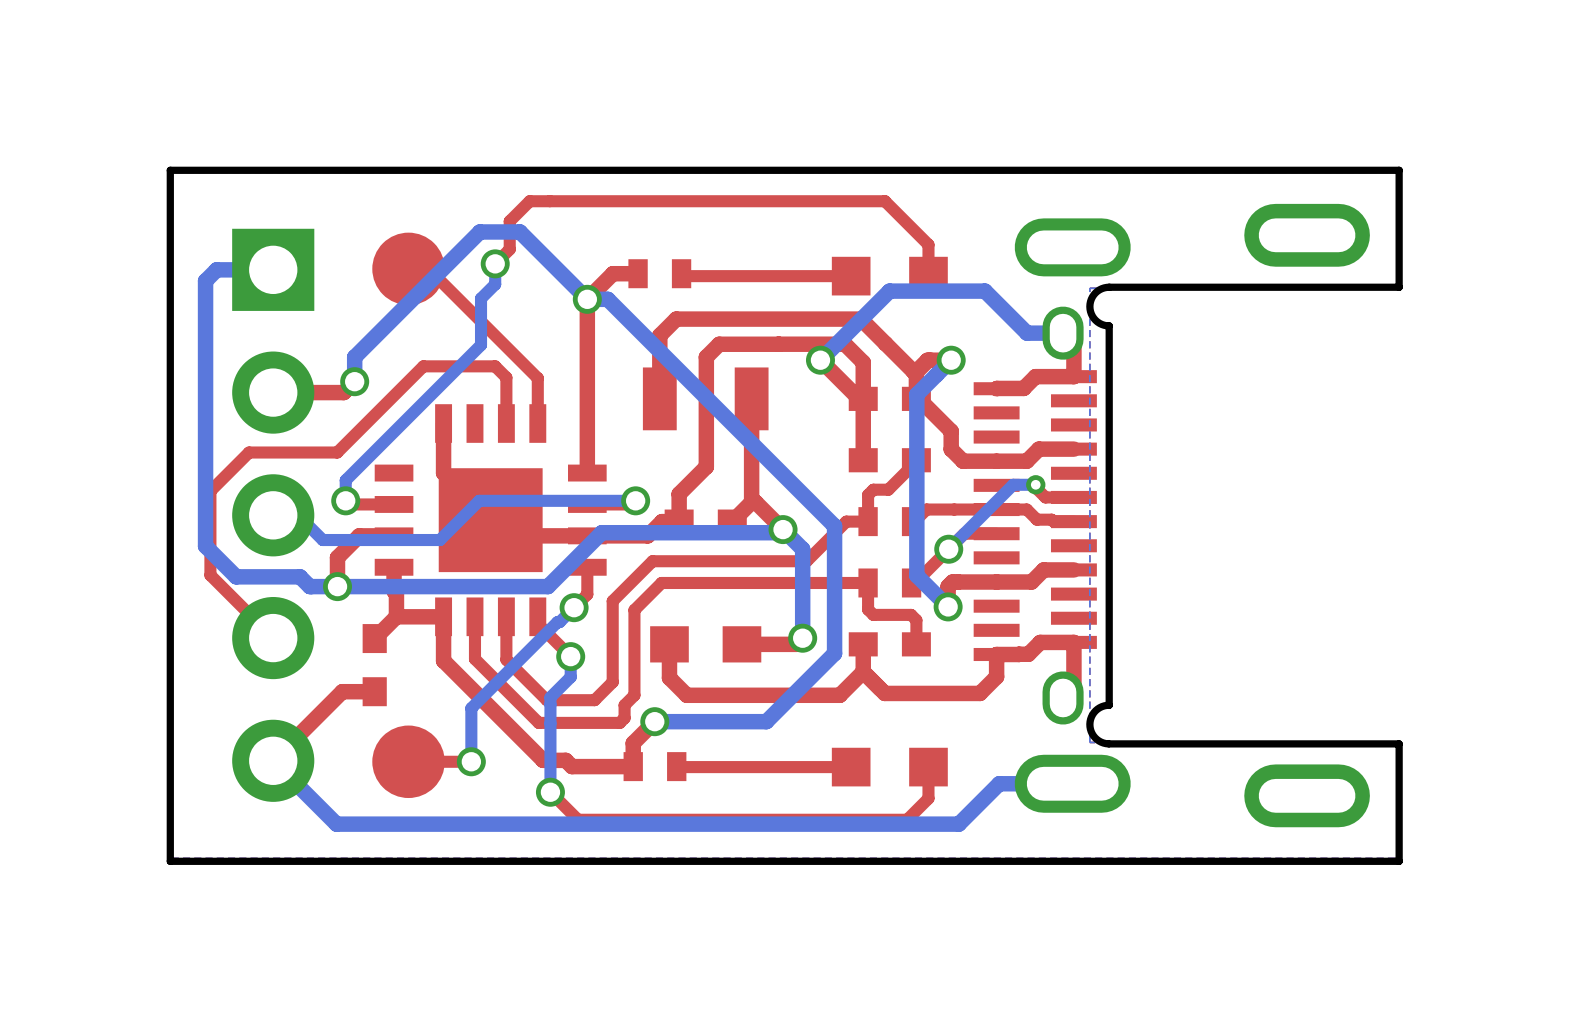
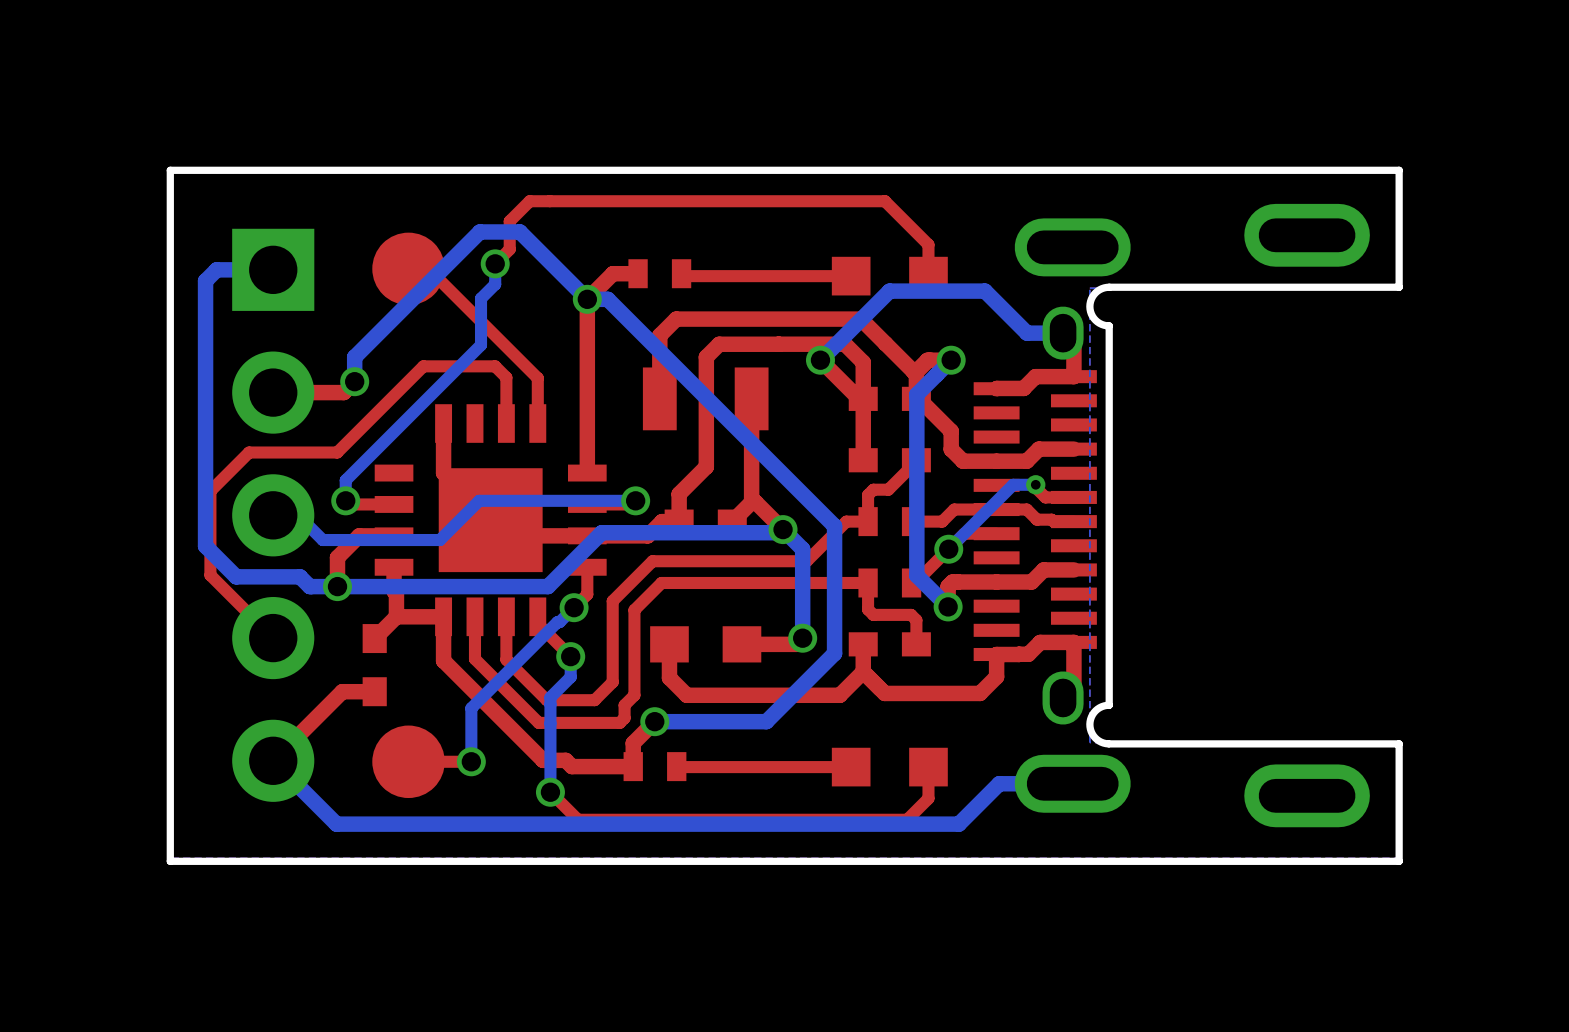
top track: (954, 509) (926, 509) (914, 521) -> (954, 509) (942, 521) (914, 521)

